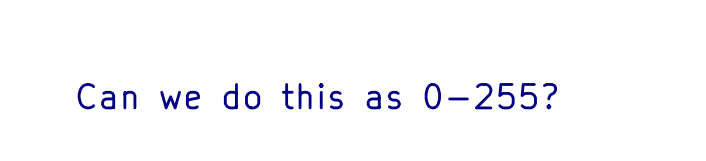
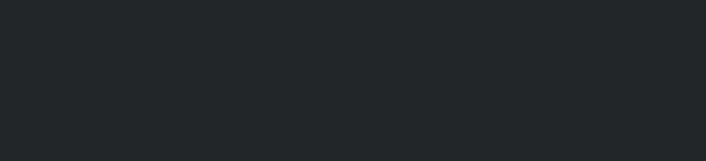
text: Can we do this as 0-255? (317, 96) -> none

